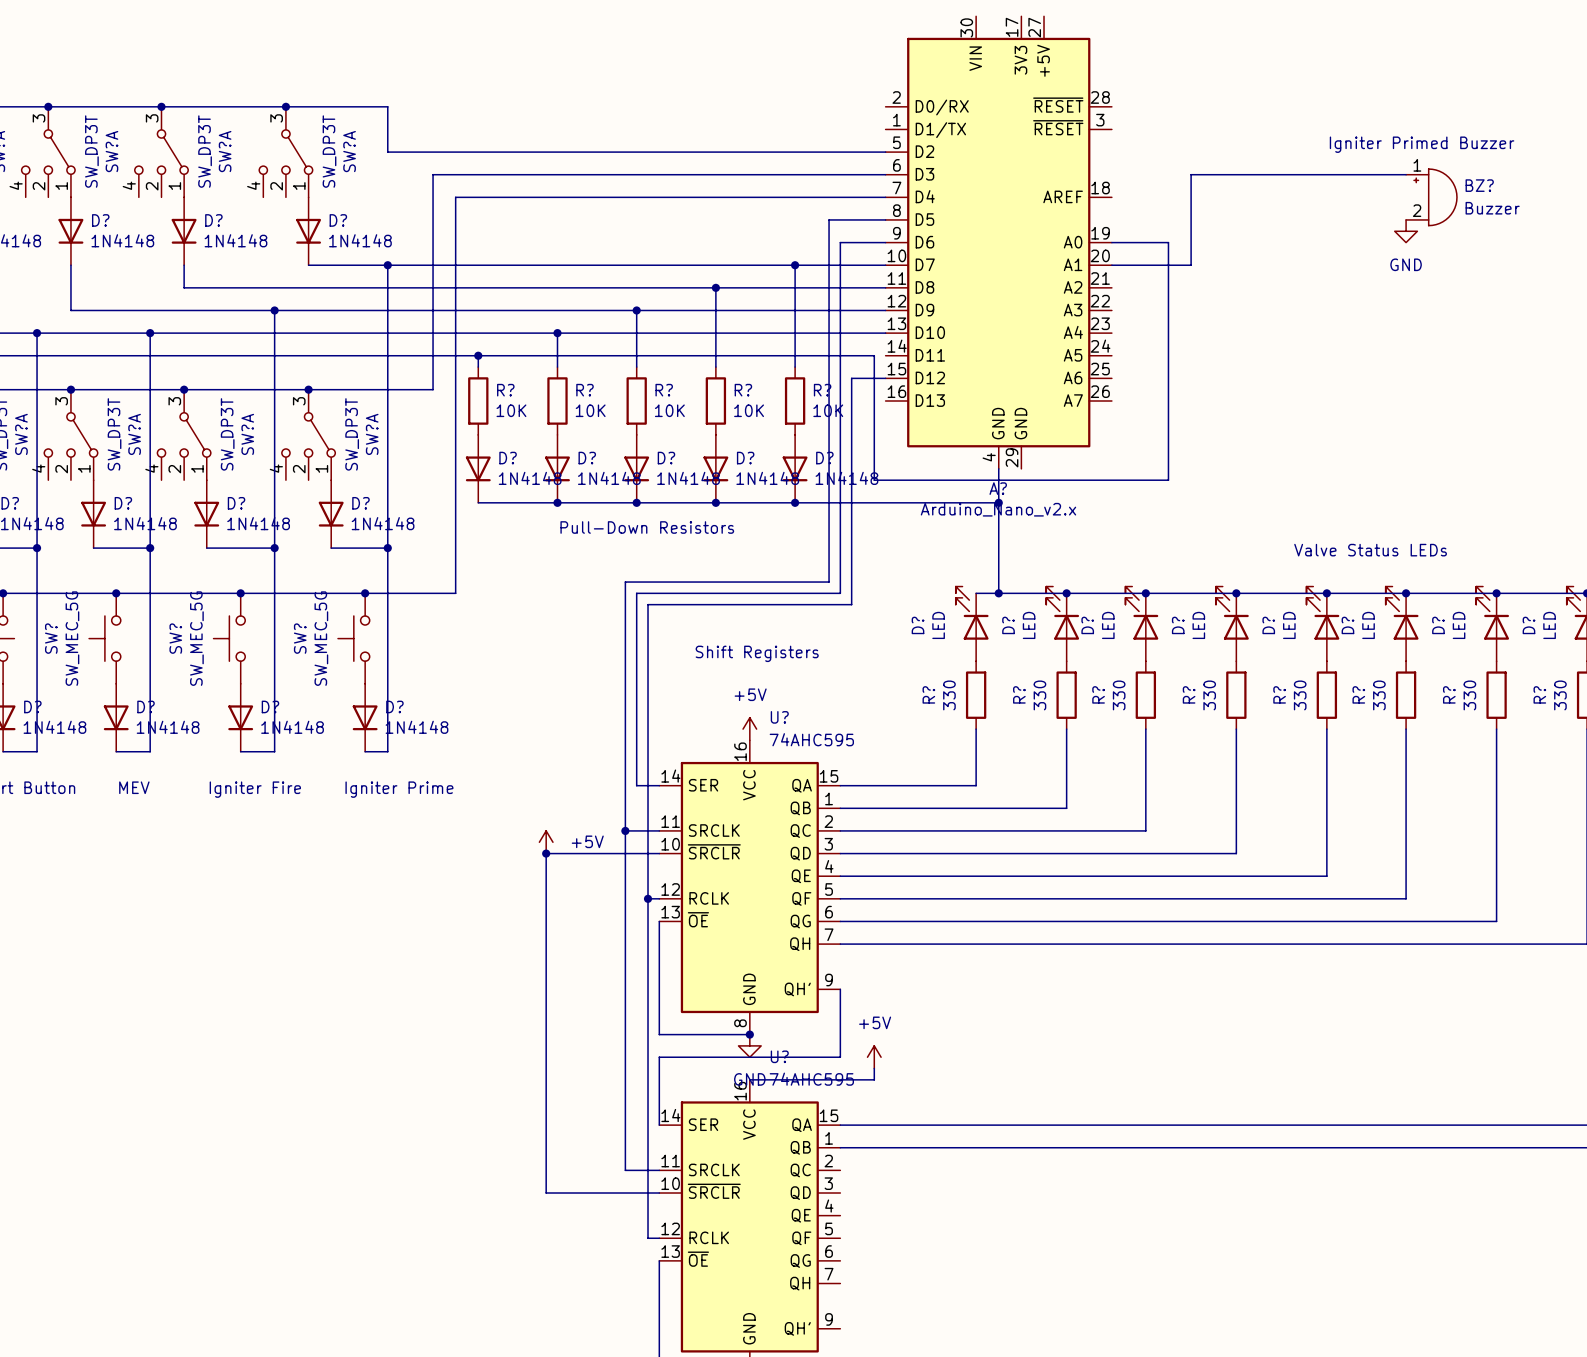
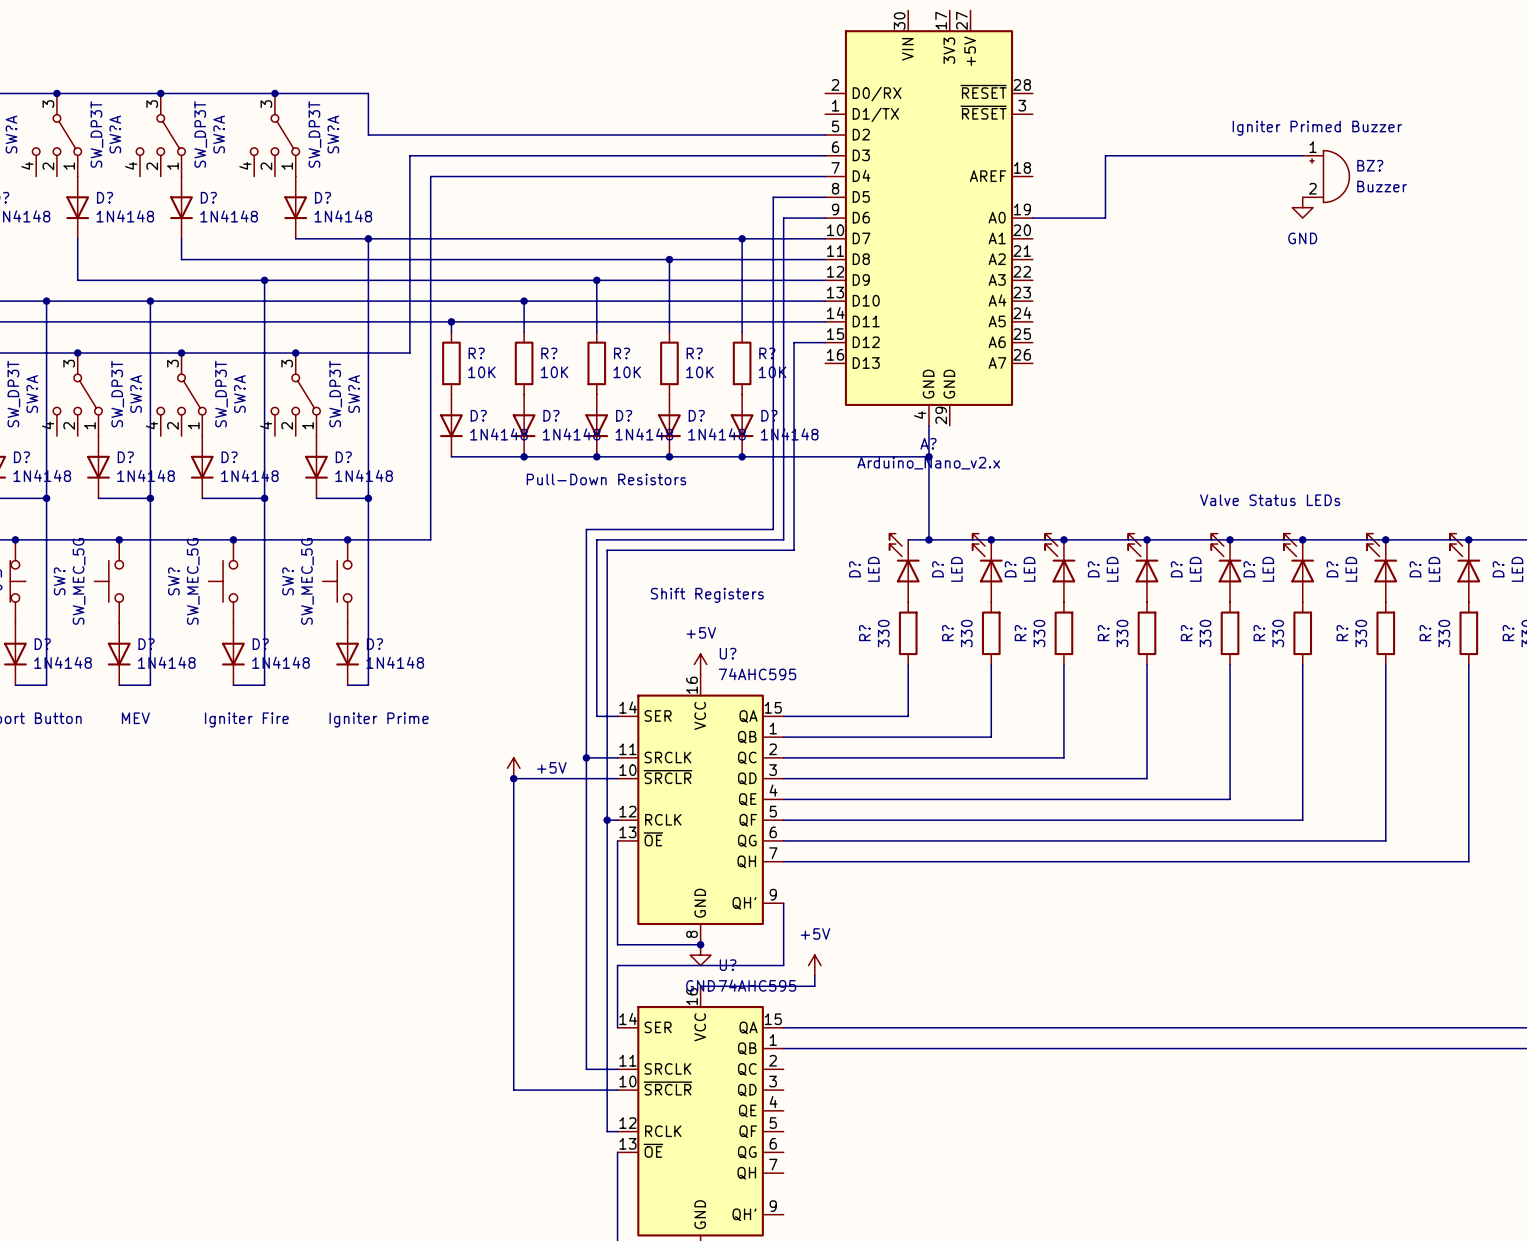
wire: (1168, 242) (1168, 480) (874, 480) (874, 355) -> (825, 321) (814, 321)
wire: (1191, 242) (1191, 265) (1111, 265) -> (1105, 218) (1084, 218)

